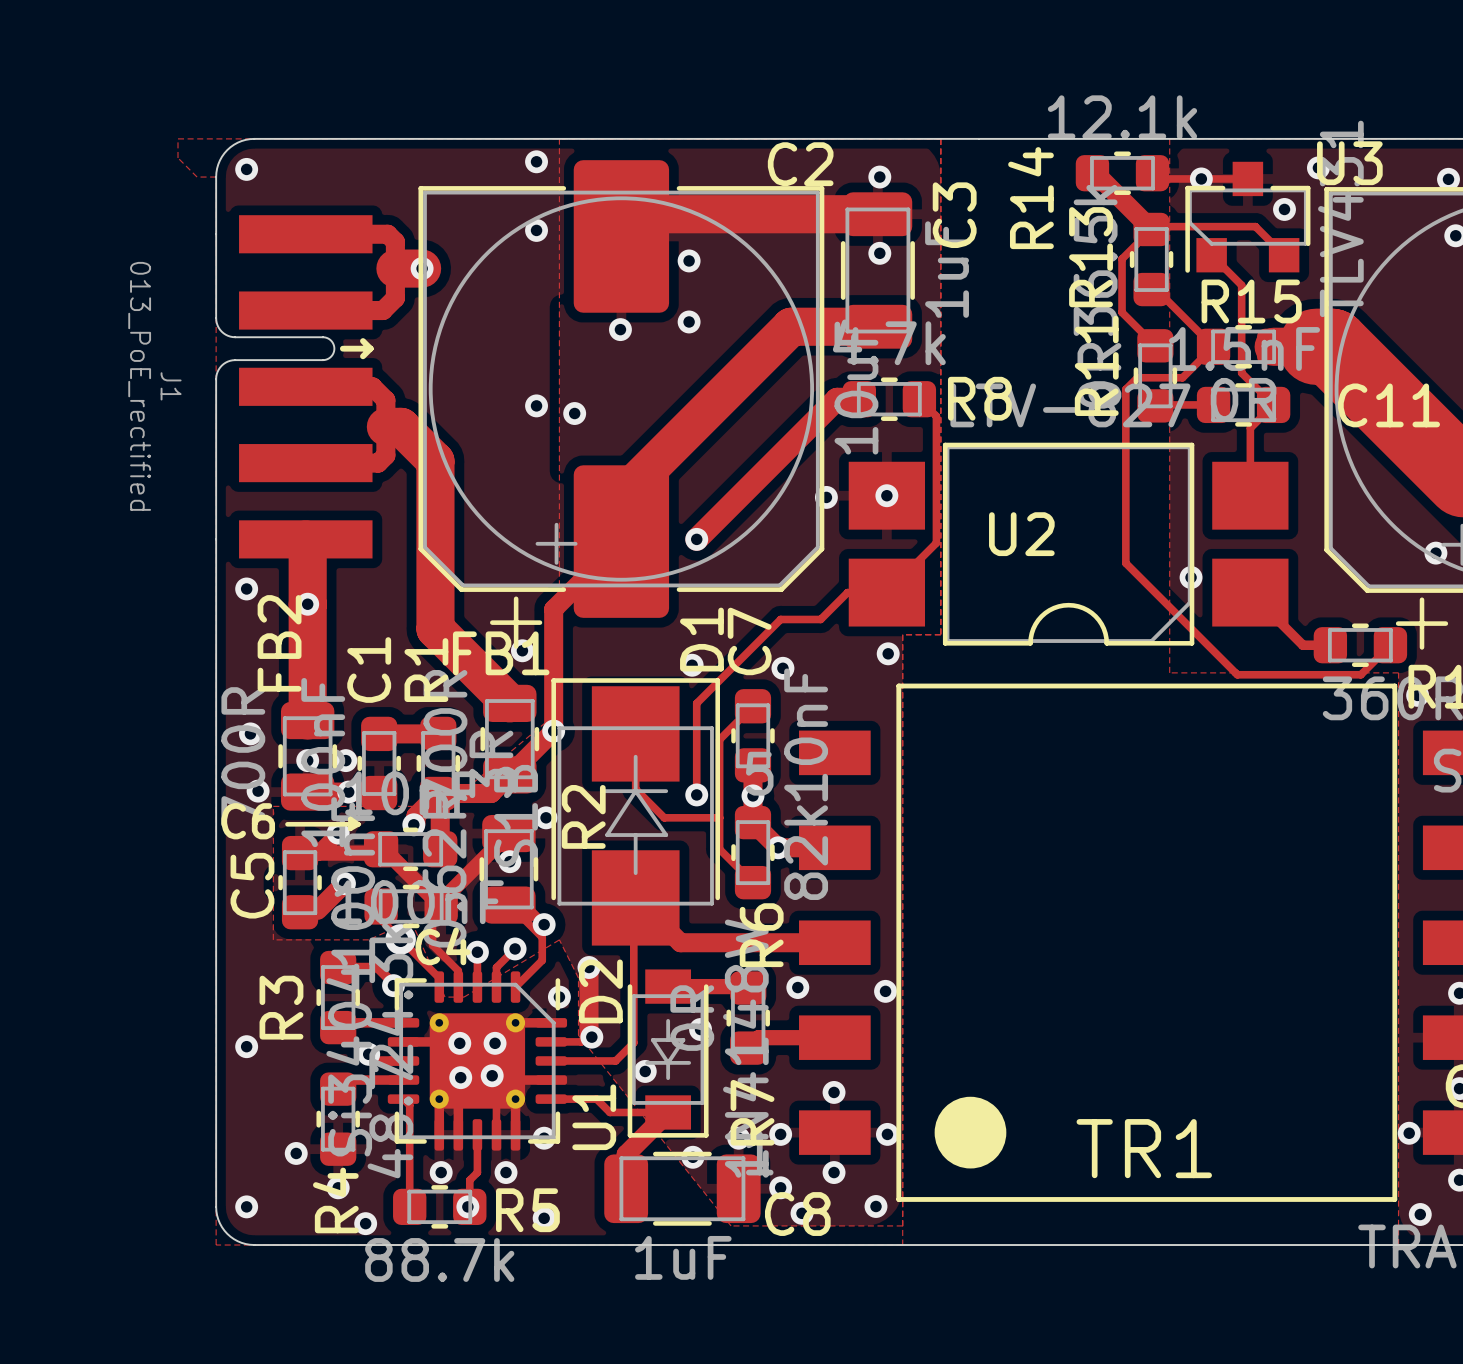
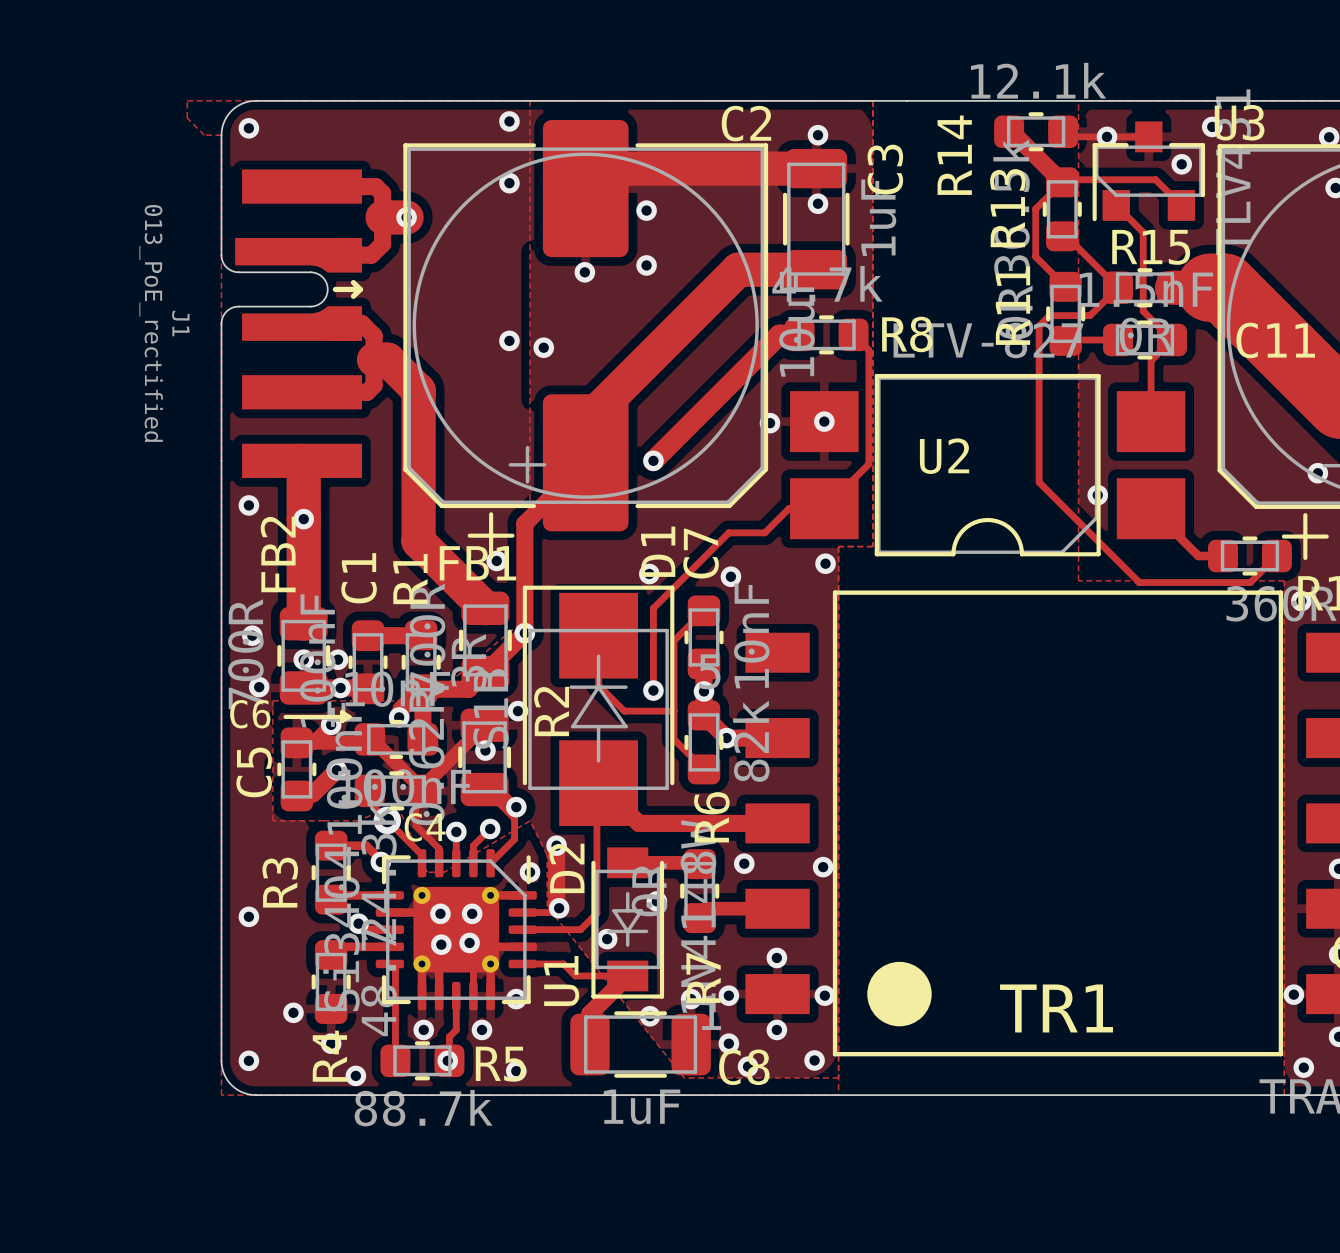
J1 footprint: [215, 215, 374, 559] -> [220, 169, 363, 479]

